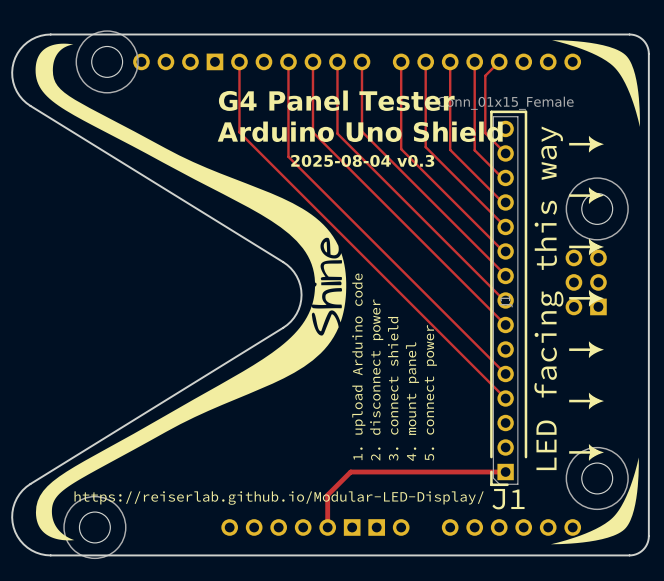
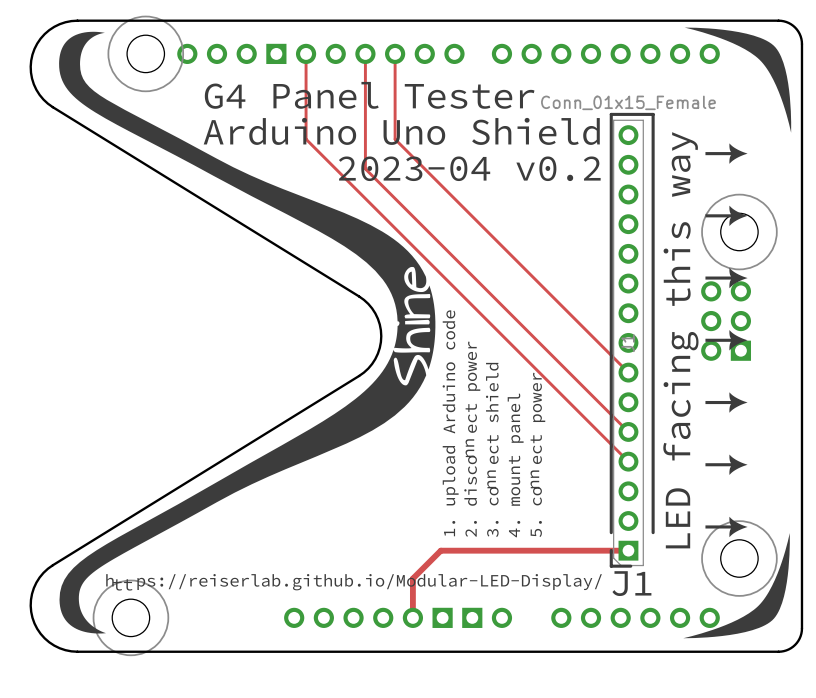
track: (337, 61) (337, 133) (505, 300) -> none
track: (361, 61) (361, 131) (505, 275) -> none
track: (401, 61) (401, 149) (505, 251) -> none
track: (425, 61) (425, 147) (505, 226) -> none
track: (450, 61) (450, 149) (502, 202) (505, 202) -> none
track: (474, 61) (474, 150) (502, 177) (505, 177) -> none
track: (499, 61) (485, 75) (485, 133) (505, 153) -> none
drawing: none -> [203, 81, 601, 182]
text: G4 Panel Tester (336, 100) -> none
text: Arduino Uno Shield (360, 131) -> none
text: 2025-08-04 v0.3 (362, 160) -> none
drawing: [373, 376, 381, 392] -> none
drawing: none -> [465, 439, 475, 458]
drawing: [391, 402, 399, 418] -> none
drawing: [426, 402, 434, 418] -> none
drawing: none -> [487, 470, 496, 489]
drawing: none -> [530, 470, 540, 489]
drawing: [82, 492, 99, 502] -> none
drawing: none -> [113, 579, 133, 591]

